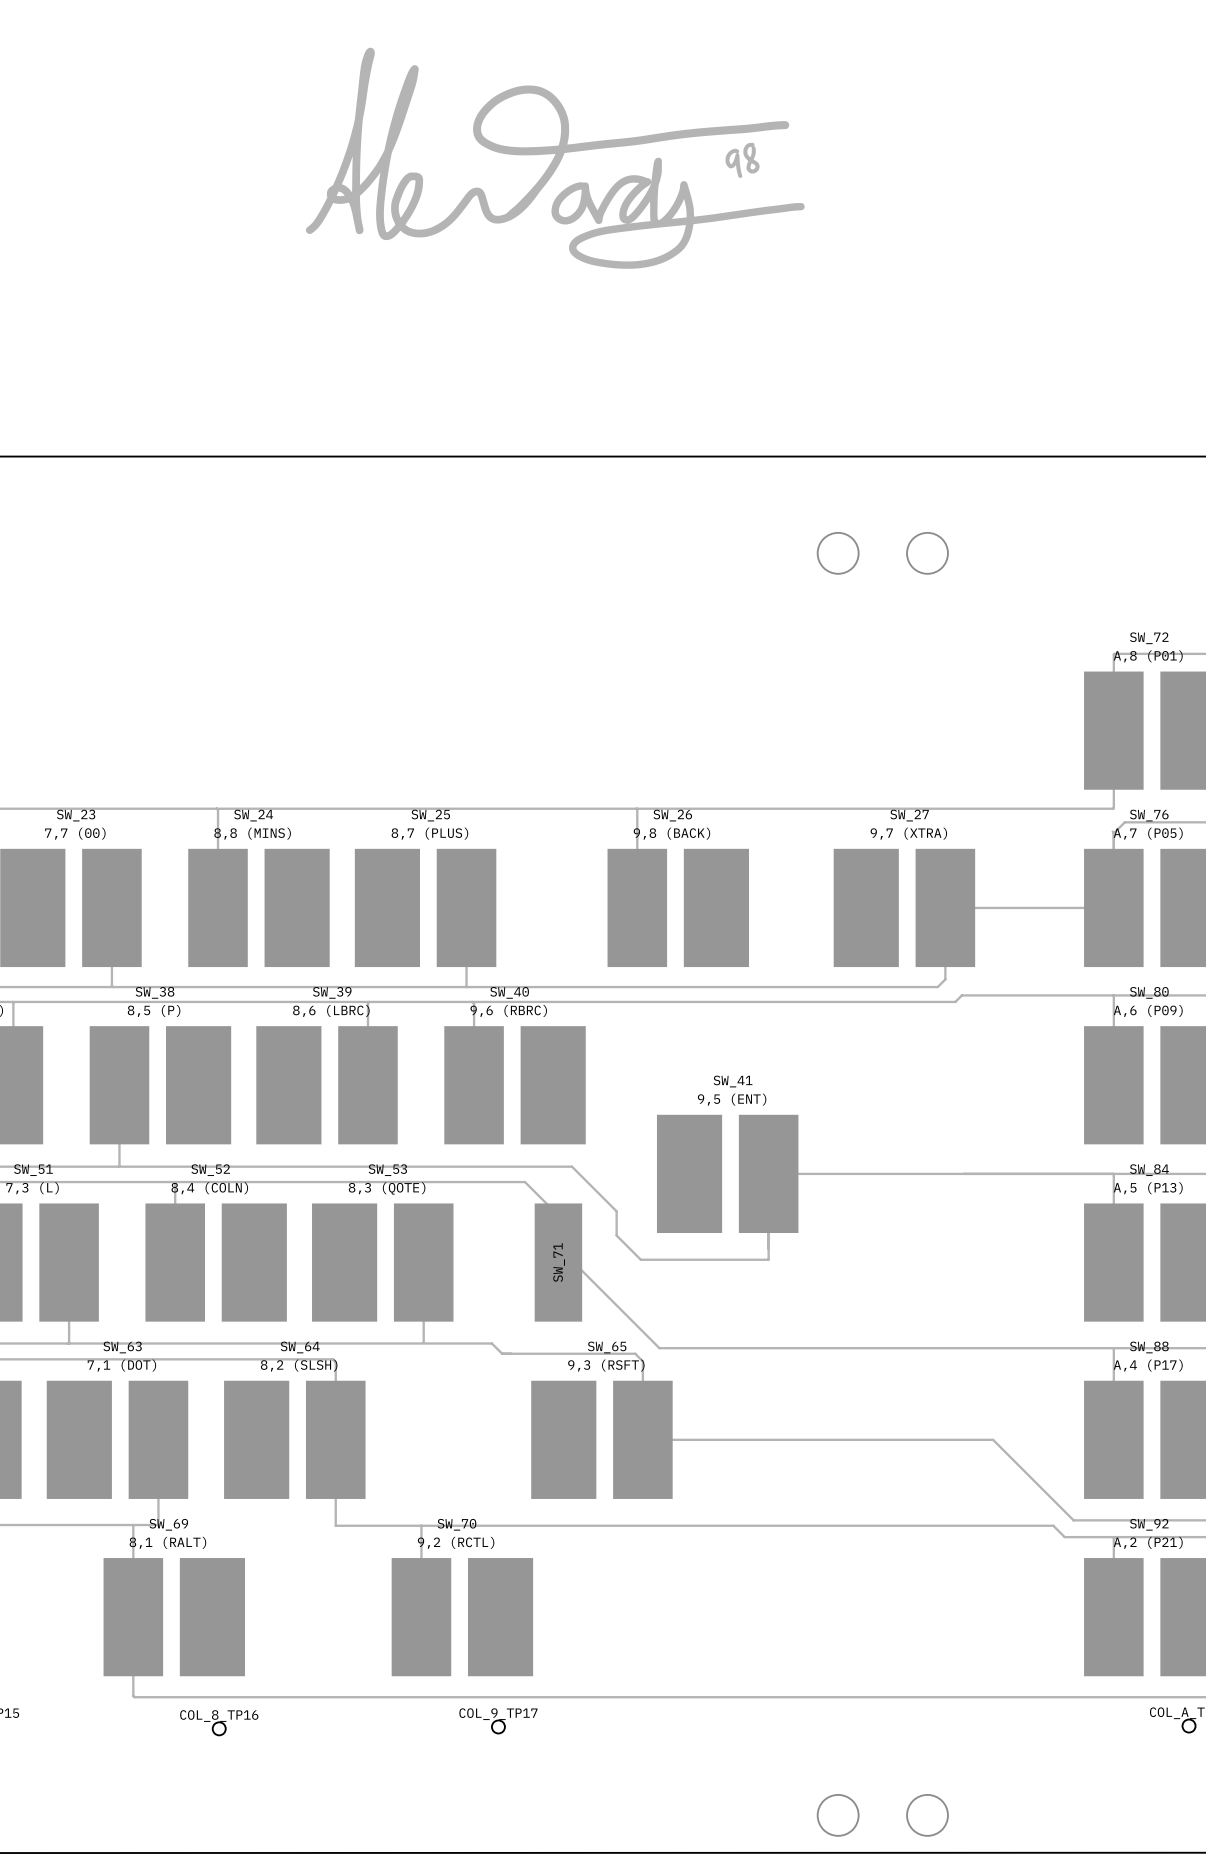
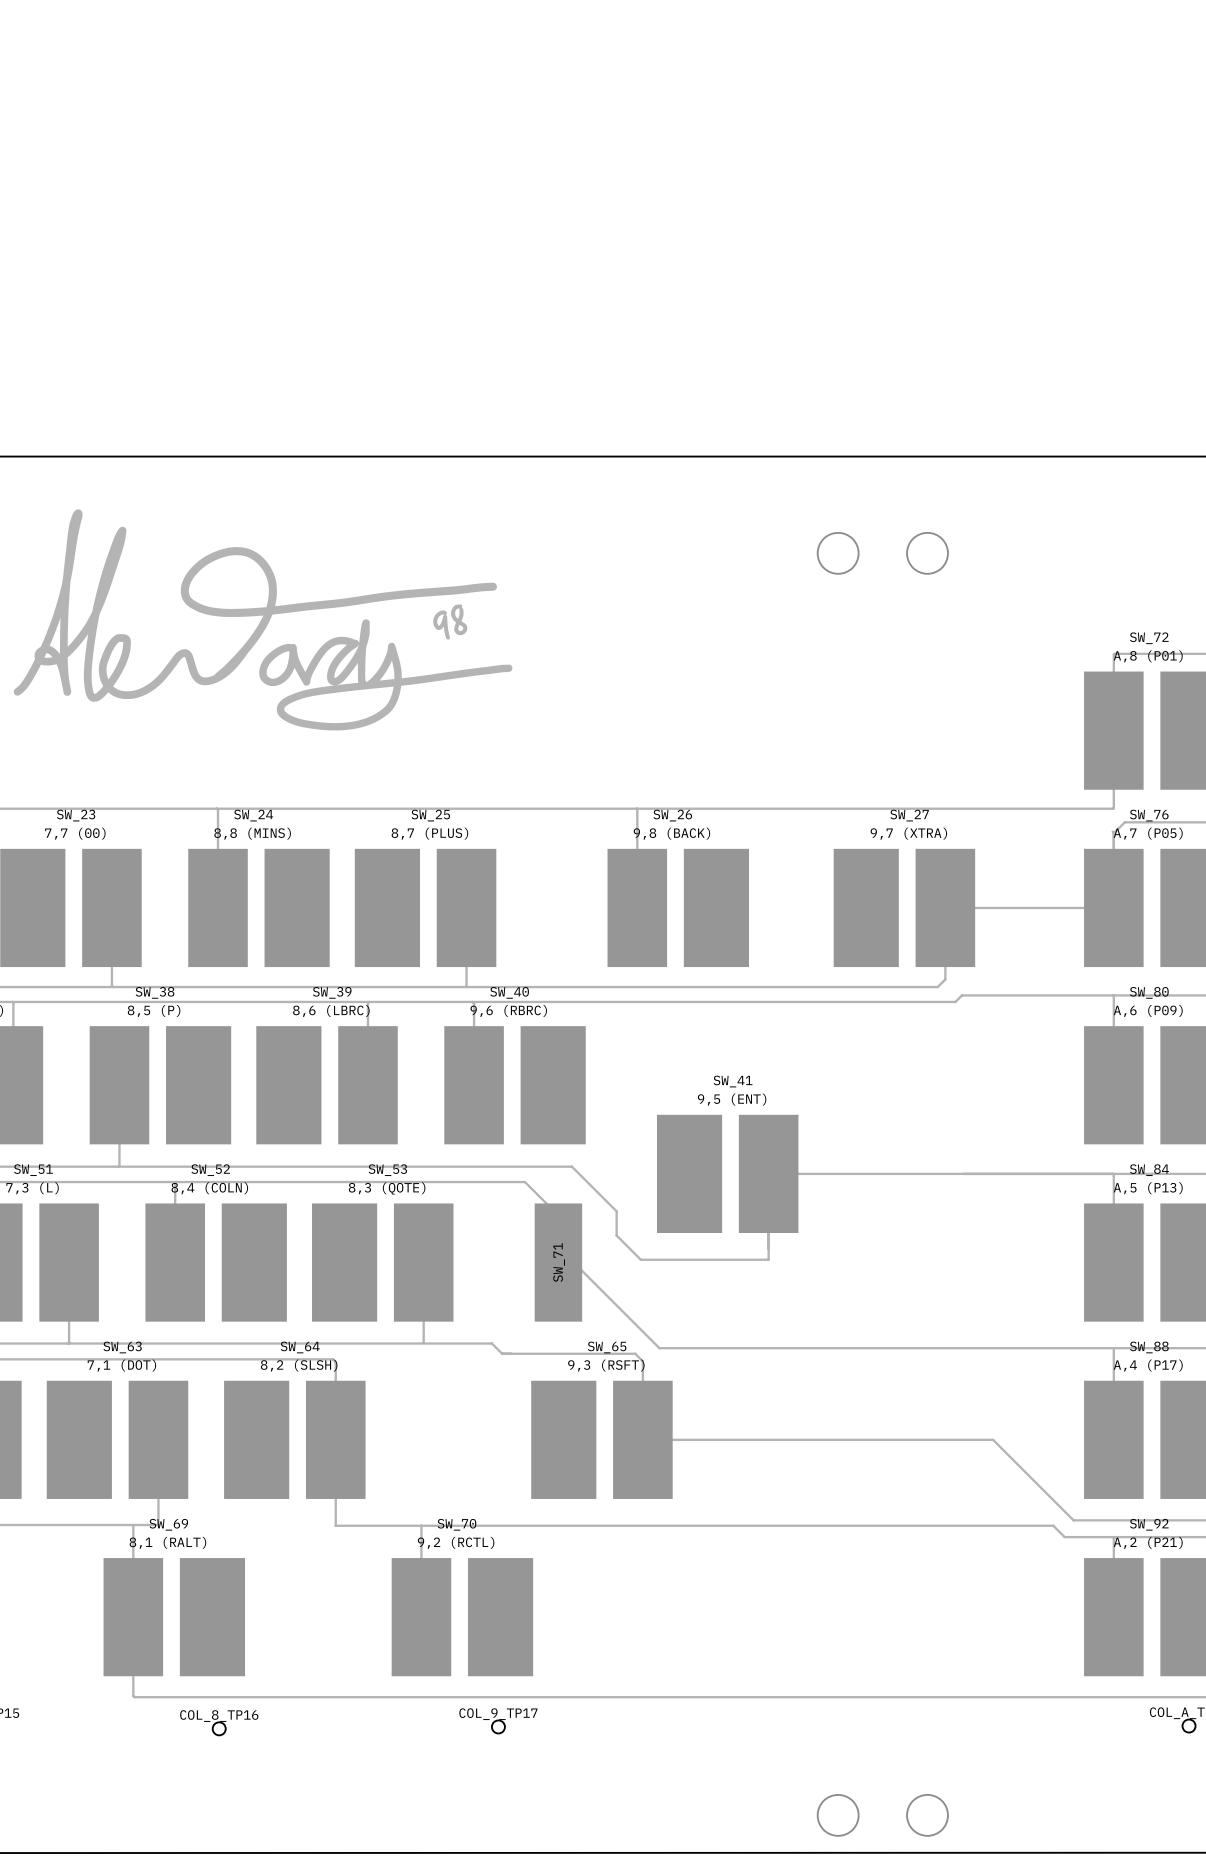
drawing: [305, 47, 805, 269] -> none
drawing: none -> [13, 509, 513, 731]

